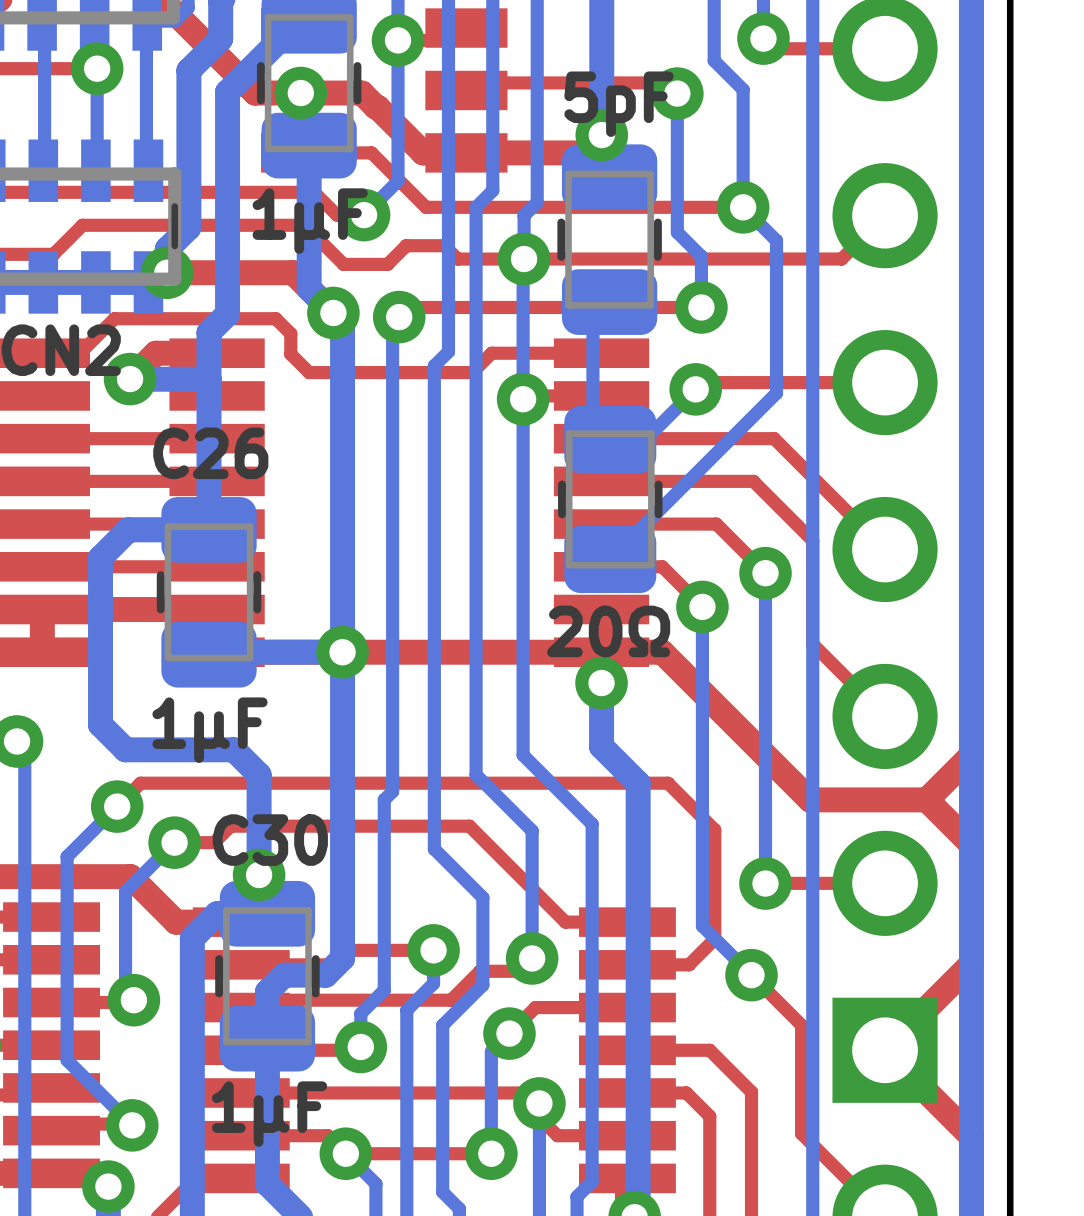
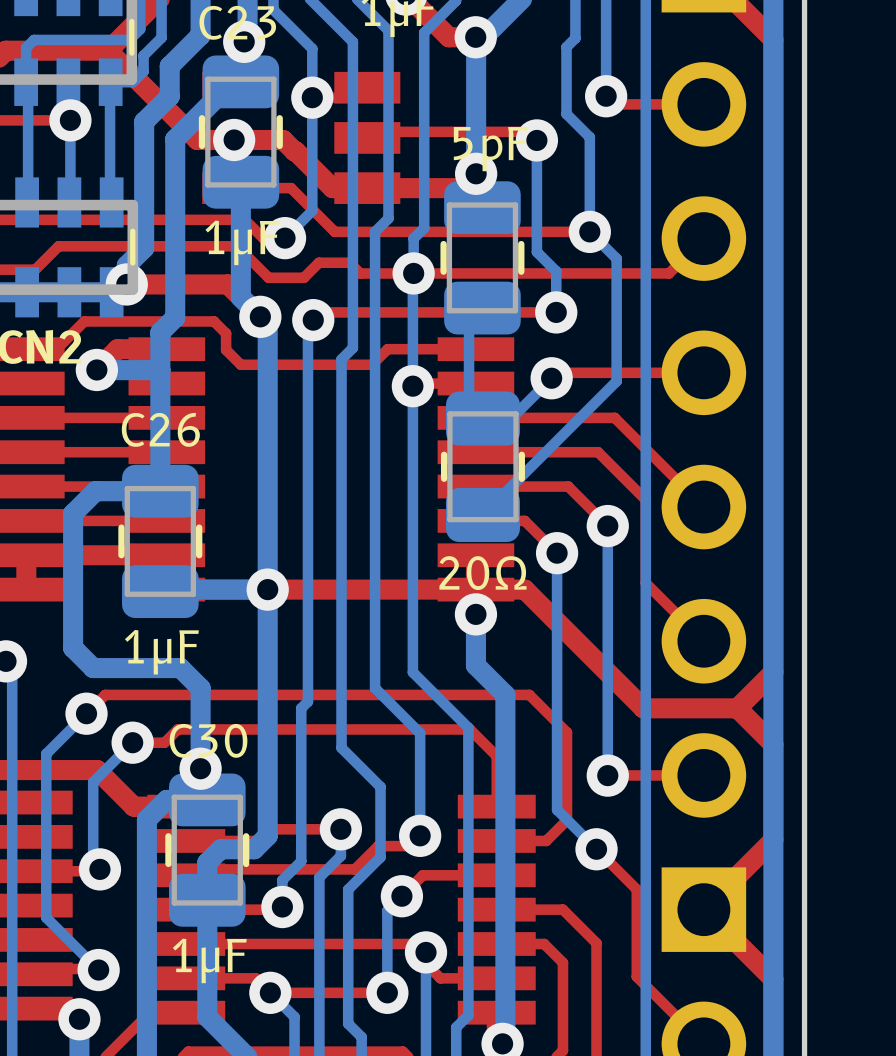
top track: (469, 826) (565, 922) (627, 922) -> (369, 729) (470, 729) (496, 756) (496, 806)

